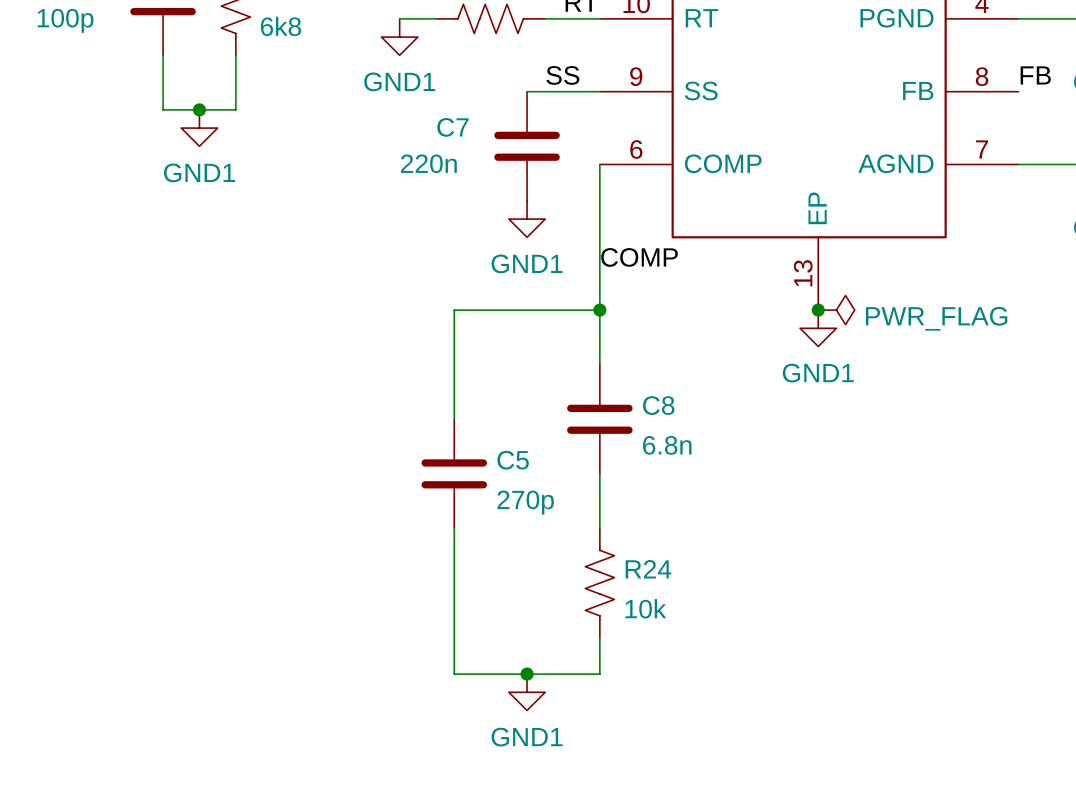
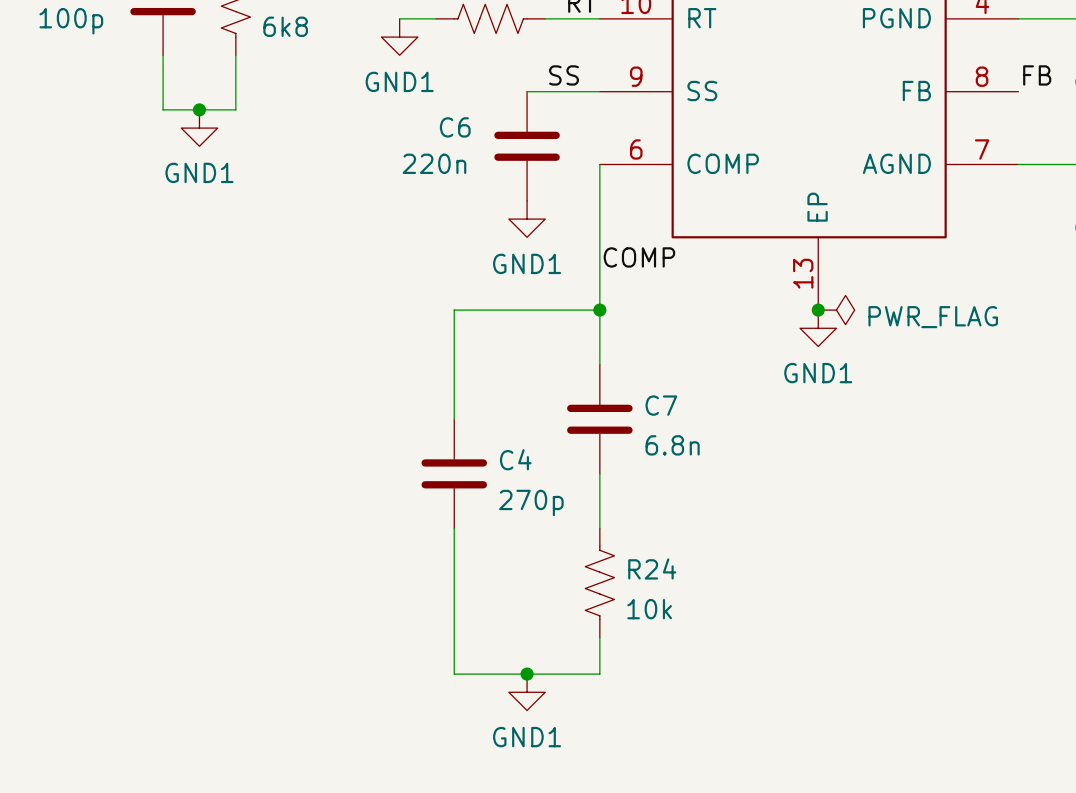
C7 name: C7 (452, 127) -> C6 (455, 127)
C8 name: C8 (658, 405) -> C7 (661, 405)
C5 name: C5 (513, 460) -> C4 (515, 459)

